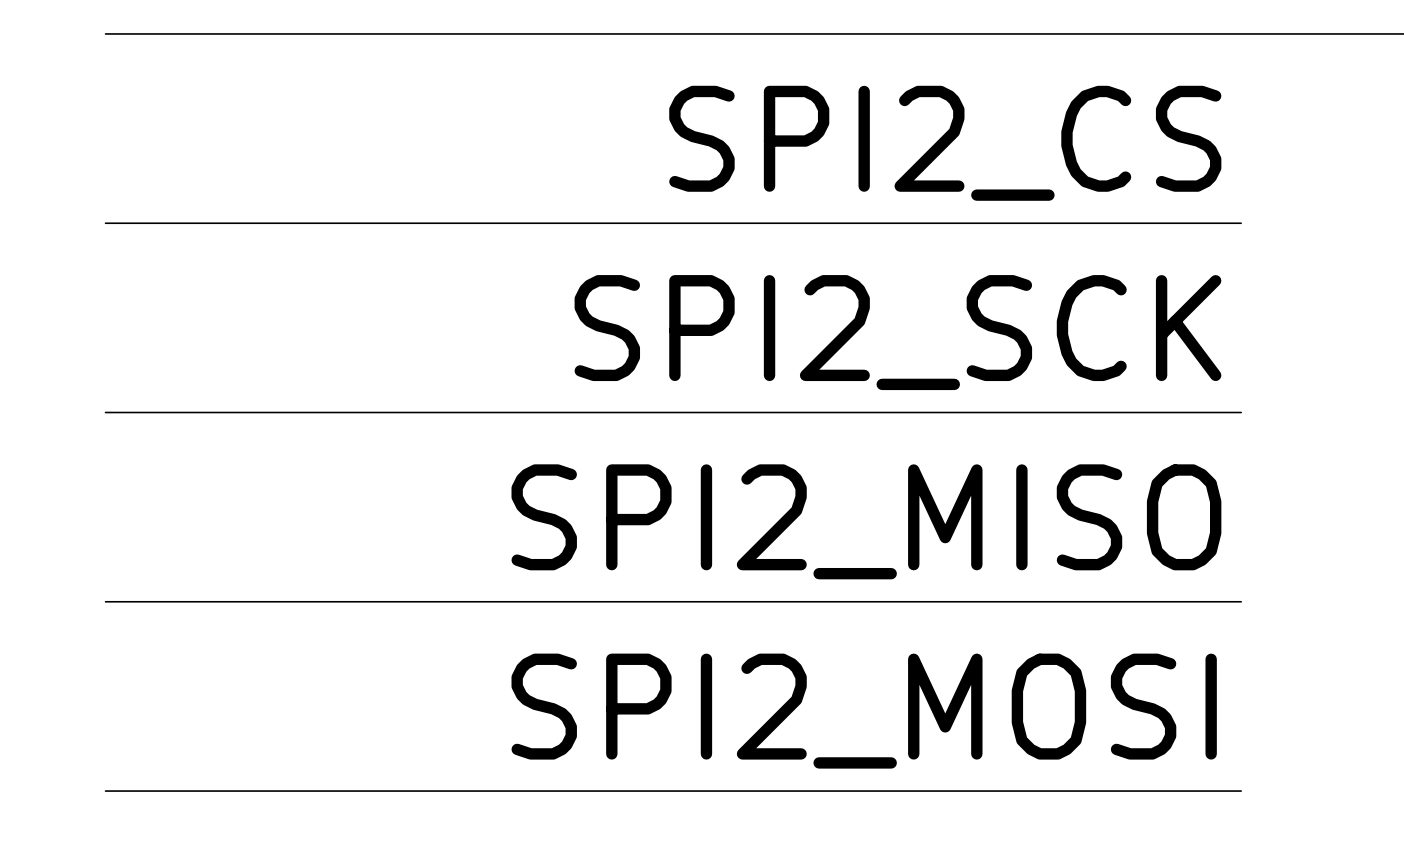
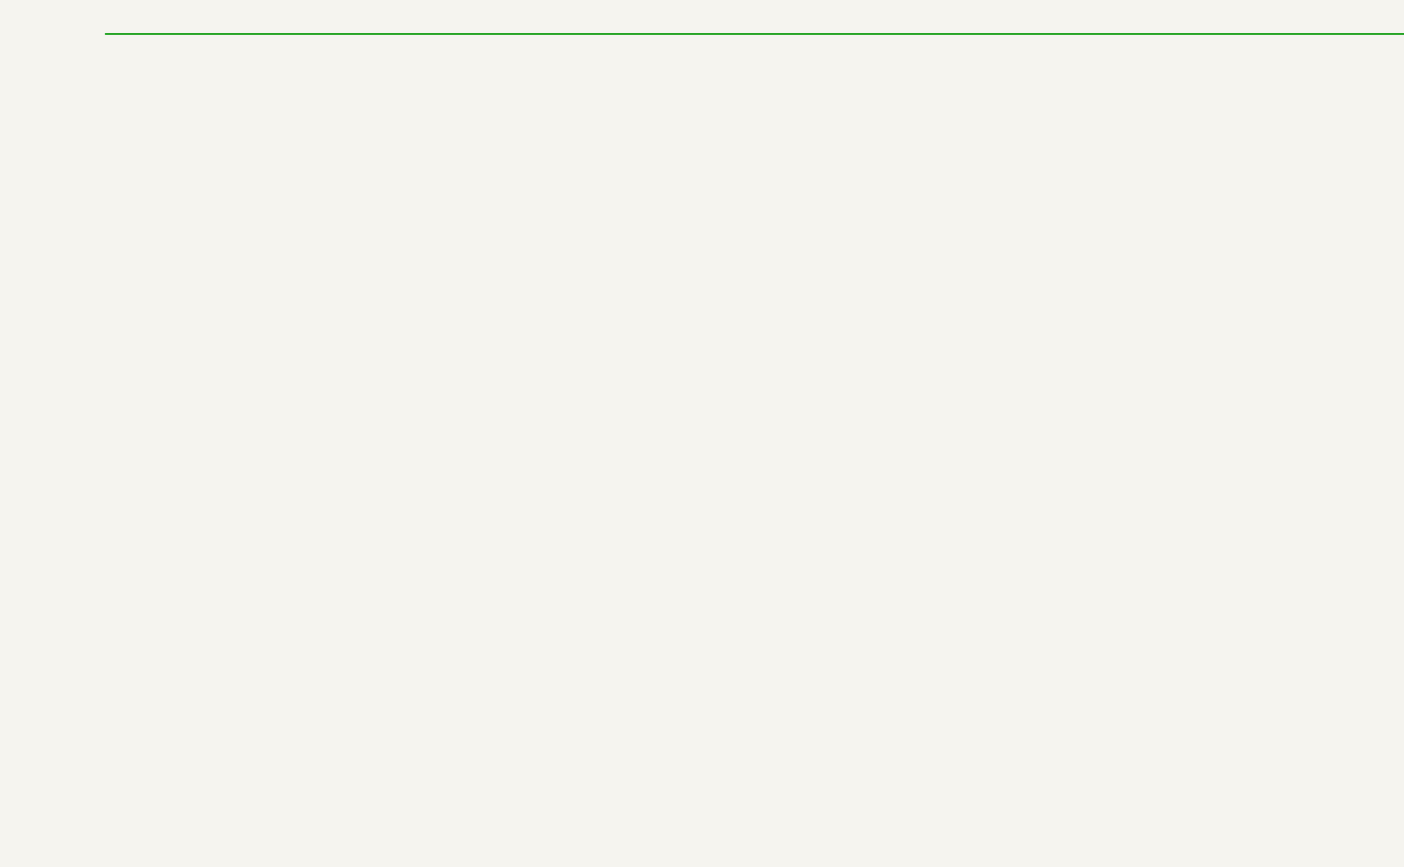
label: SPI2_CS (945, 143) -> none
wire: (105, 223) (1241, 223) -> none
label: SPI2_SCK (897, 332) -> none
wire: (105, 412) (1241, 412) -> none
label: SPI2_MISO (866, 521) -> none
wire: (105, 601) (1241, 601) -> none
label: SPI2_MOSI (864, 711) -> none
wire: (105, 791) (1241, 791) -> none

